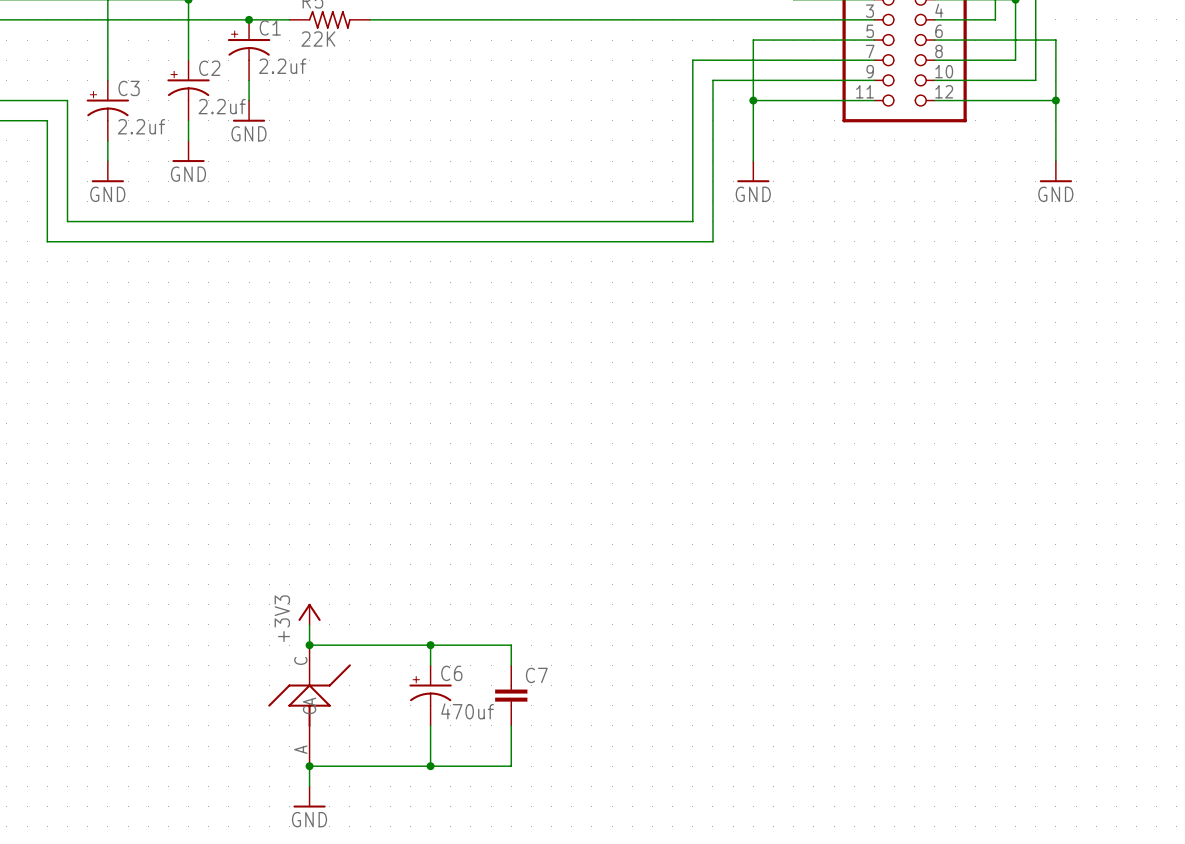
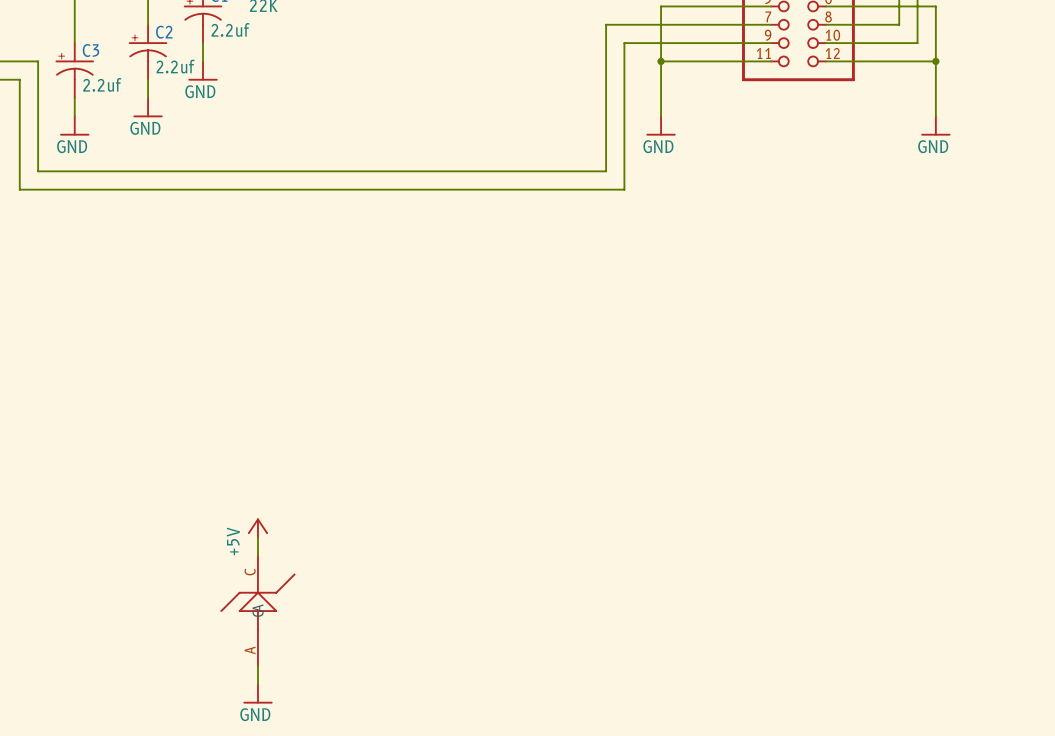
power symbol: +3V3 (309, 614) -> +5V (257, 528)
wire: (309, 645) (511, 645) (511, 665) -> none
junction: (309, 645) -> none
wire: (430, 645) (430, 665) -> none
junction: (430, 645) -> none
C6: 470uf (430, 695) -> none
C7: (511, 695) -> none
wire: (430, 725) (430, 766) -> none
wire: (511, 725) (511, 766) (309, 766) -> none
junction: (309, 766) -> none
junction: (430, 766) -> none

